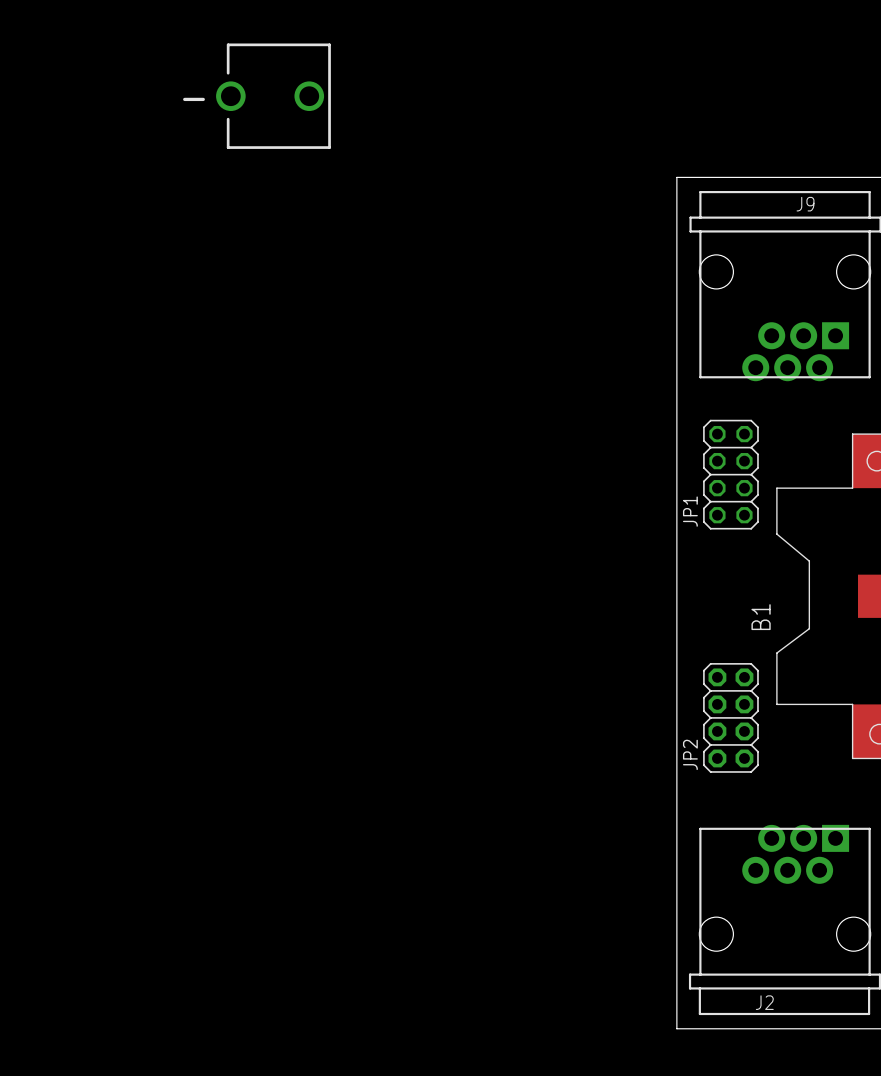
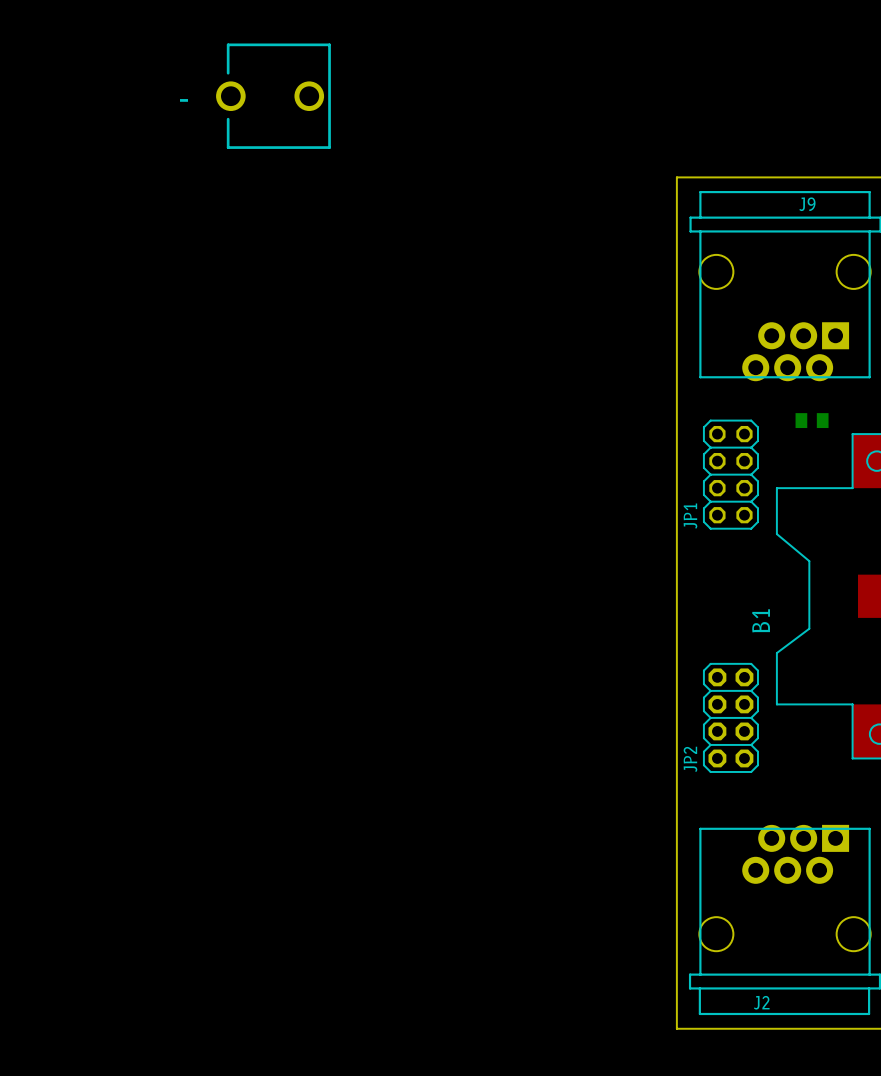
part: none -> (812, 420)

